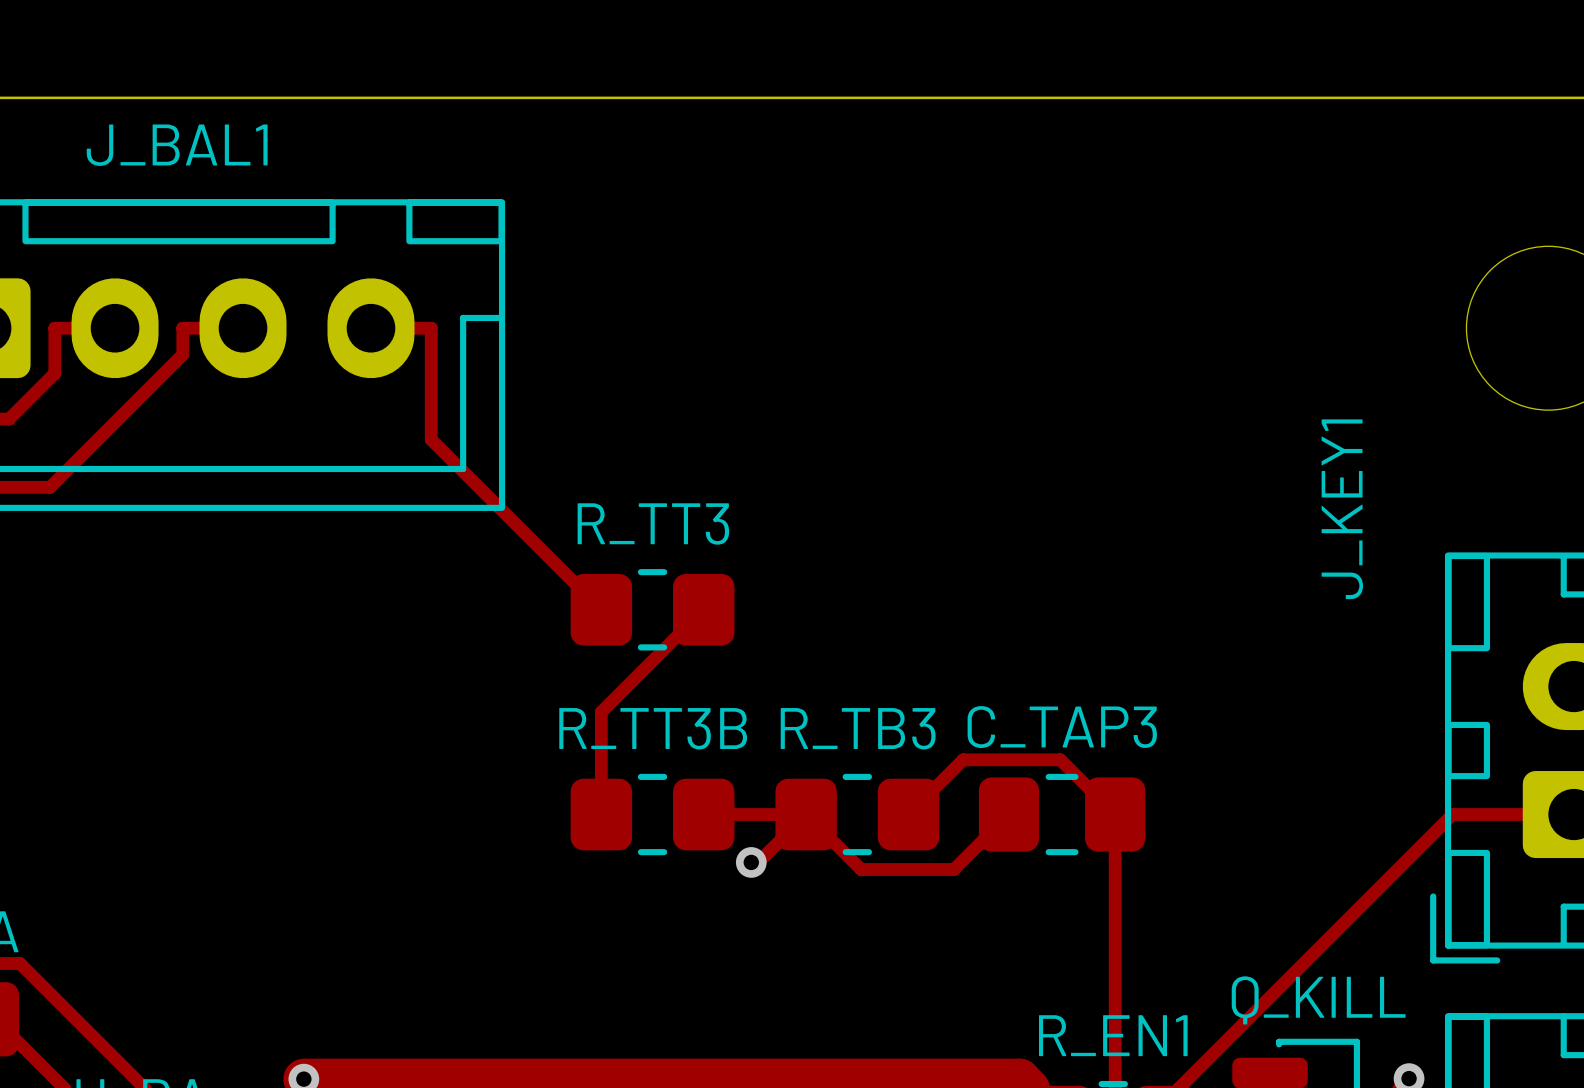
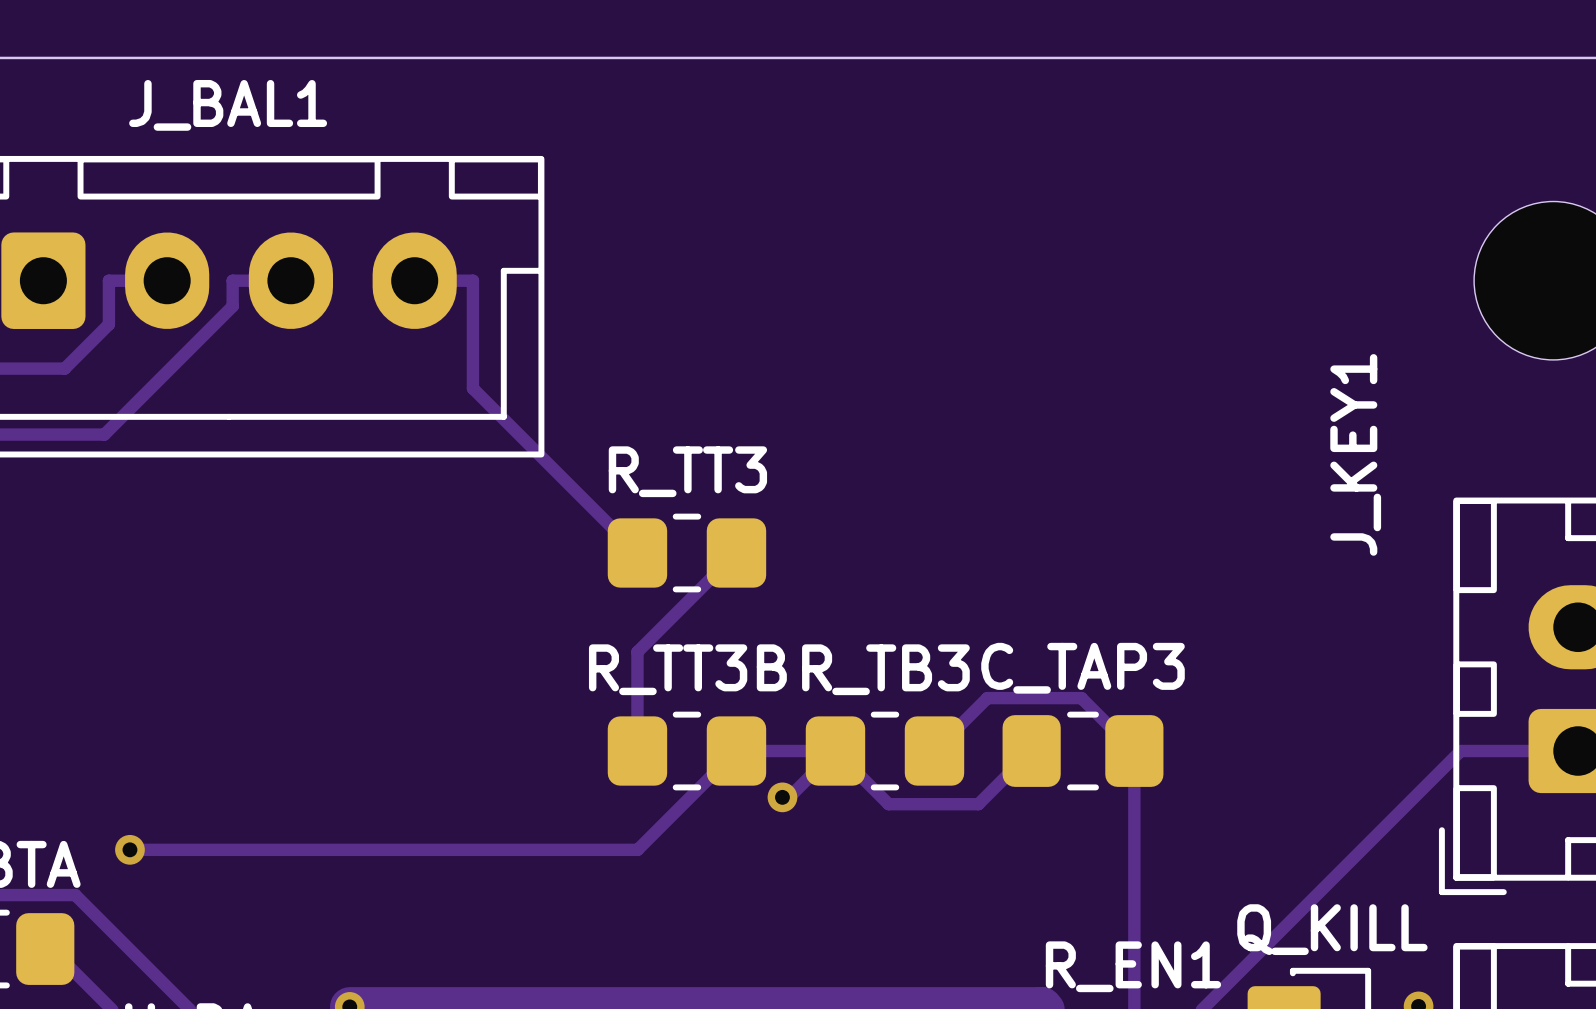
track: none -> (736, 751) (637, 849) (129, 849)
via: none -> (129, 849)

